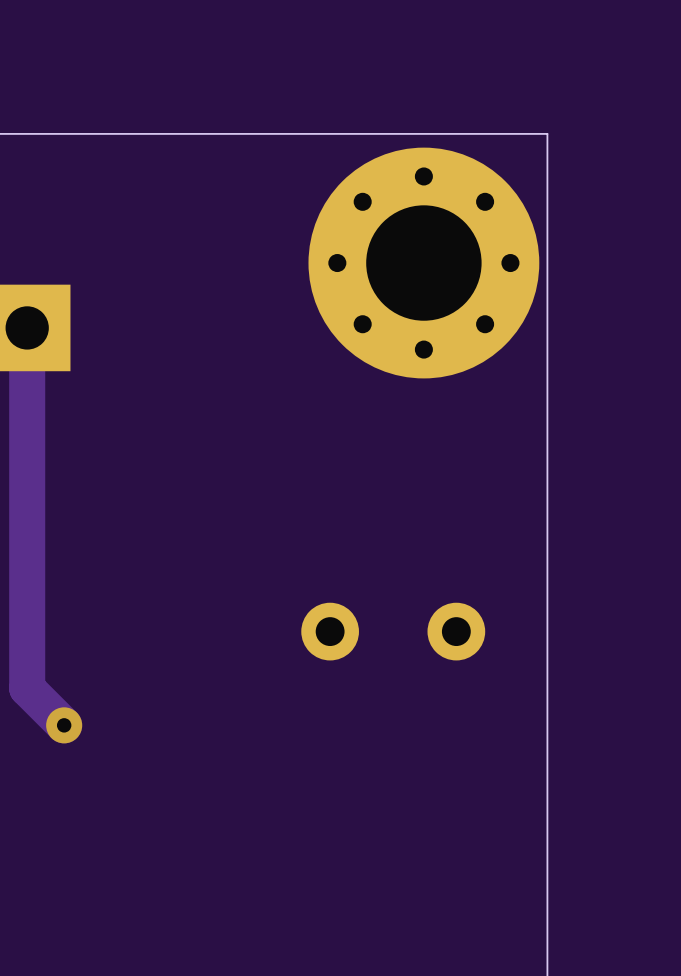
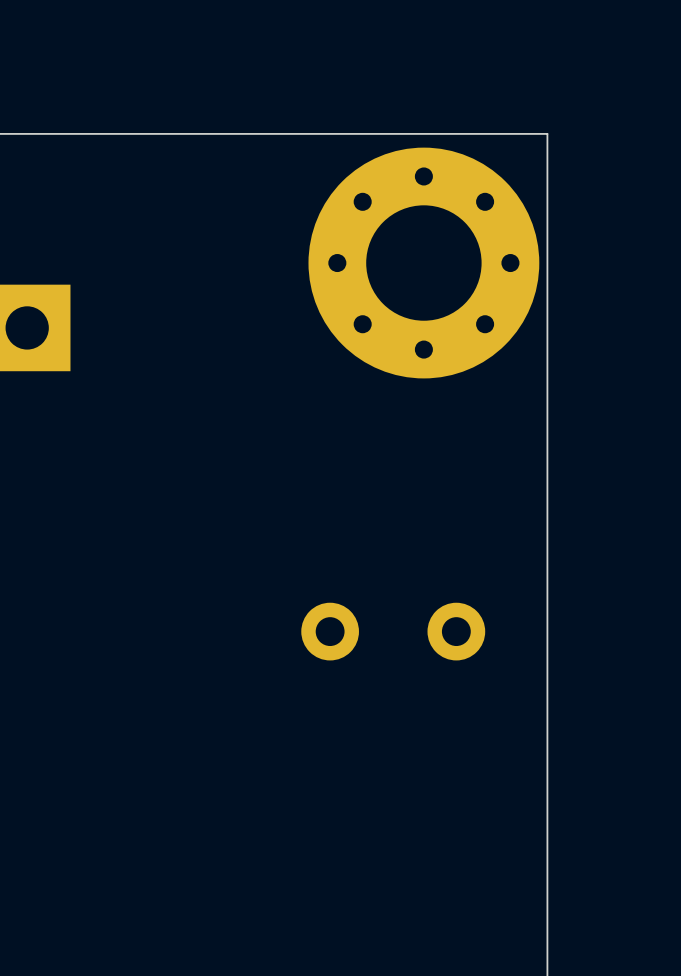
track: (27, 327) (27, 688) (64, 725) -> none
via: (64, 725) -> none

